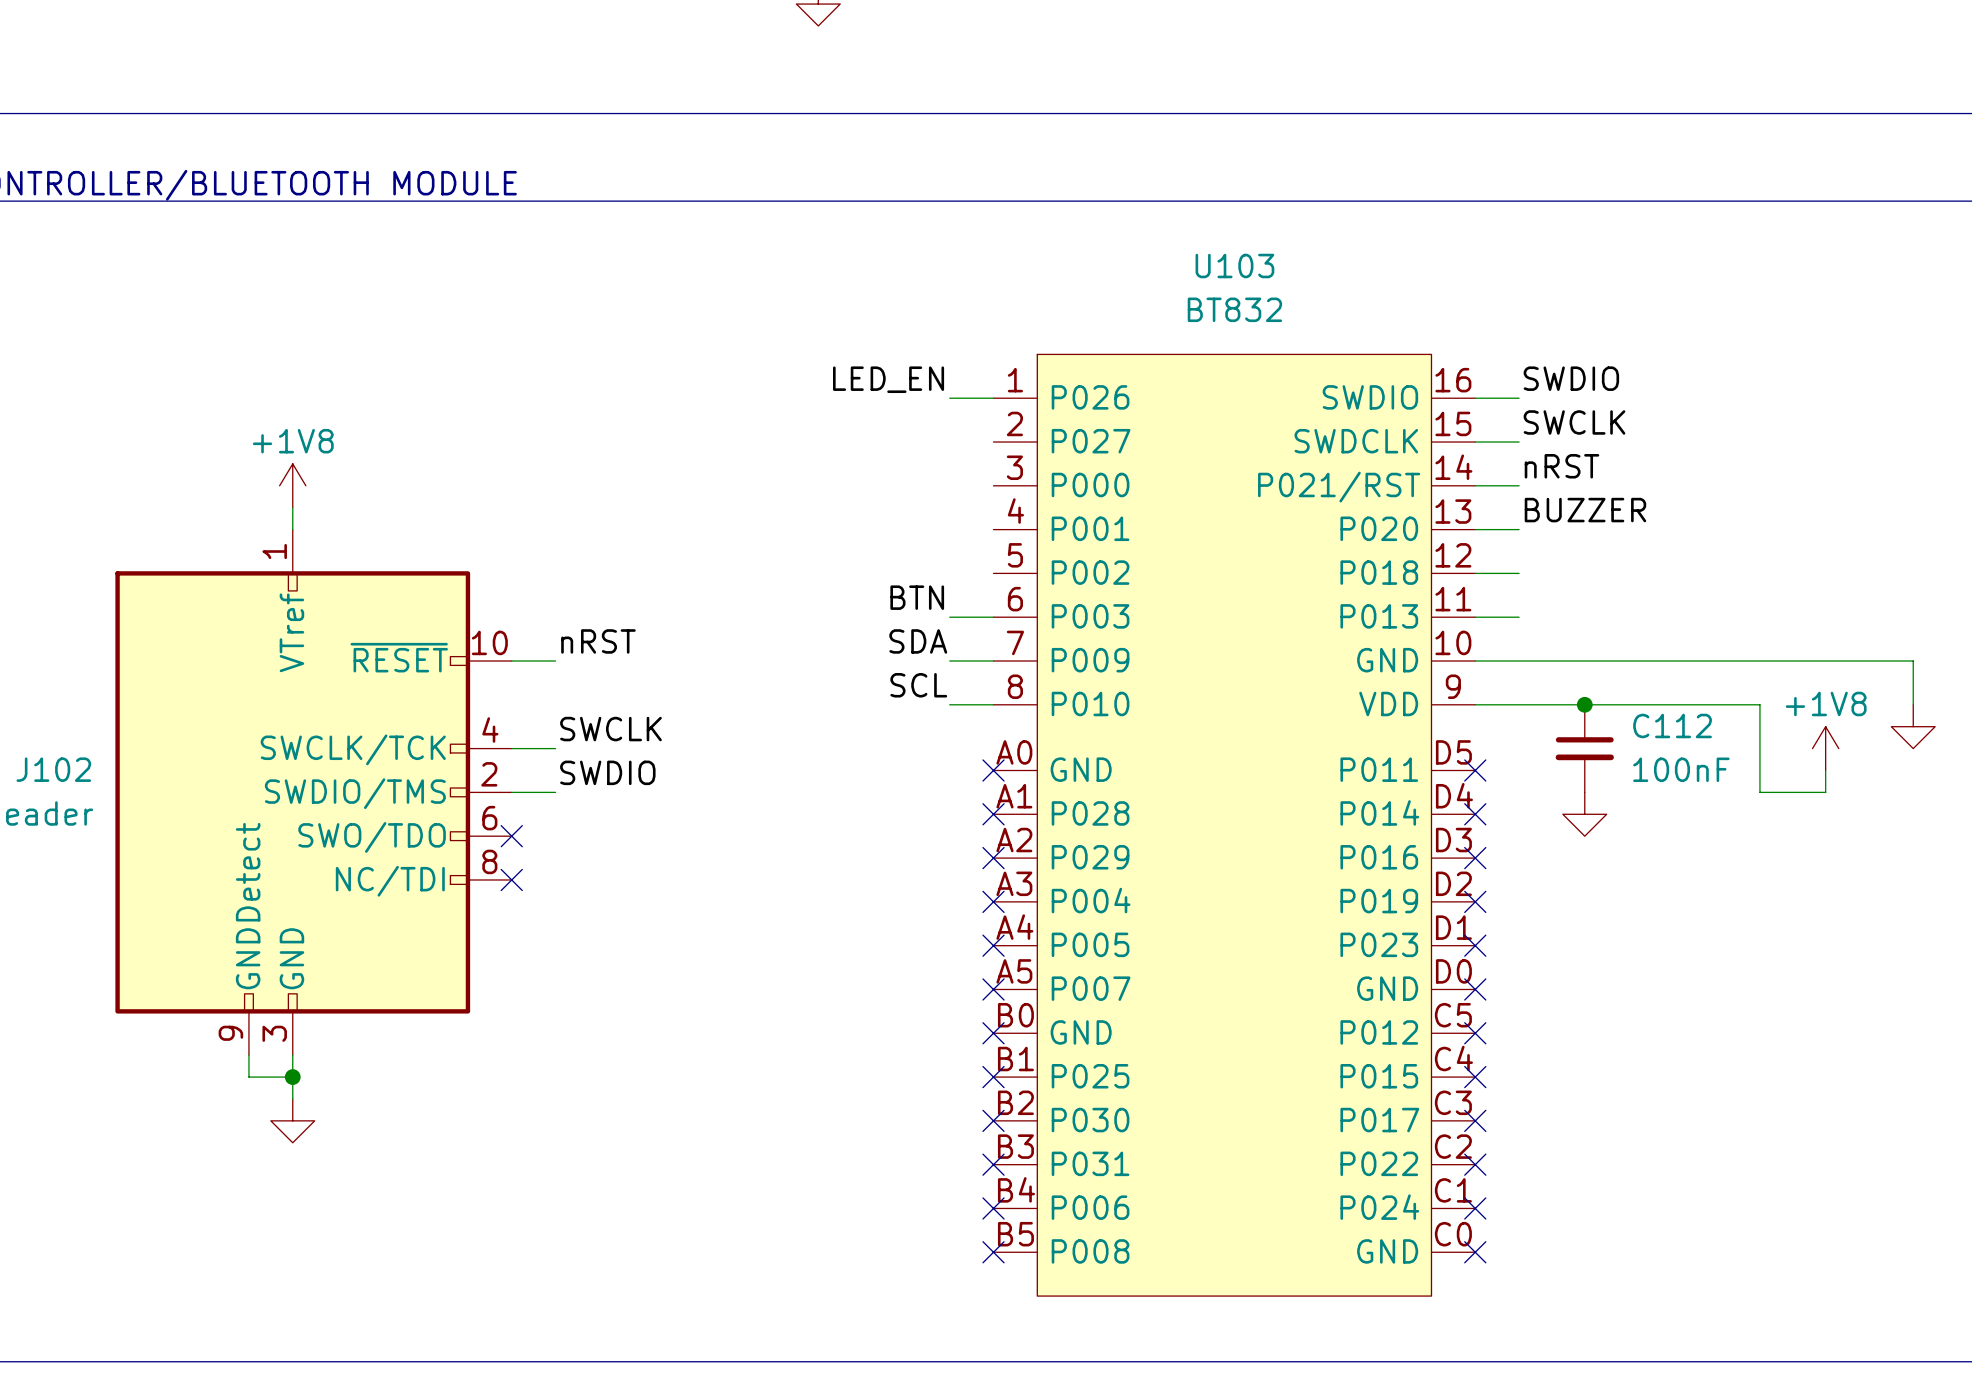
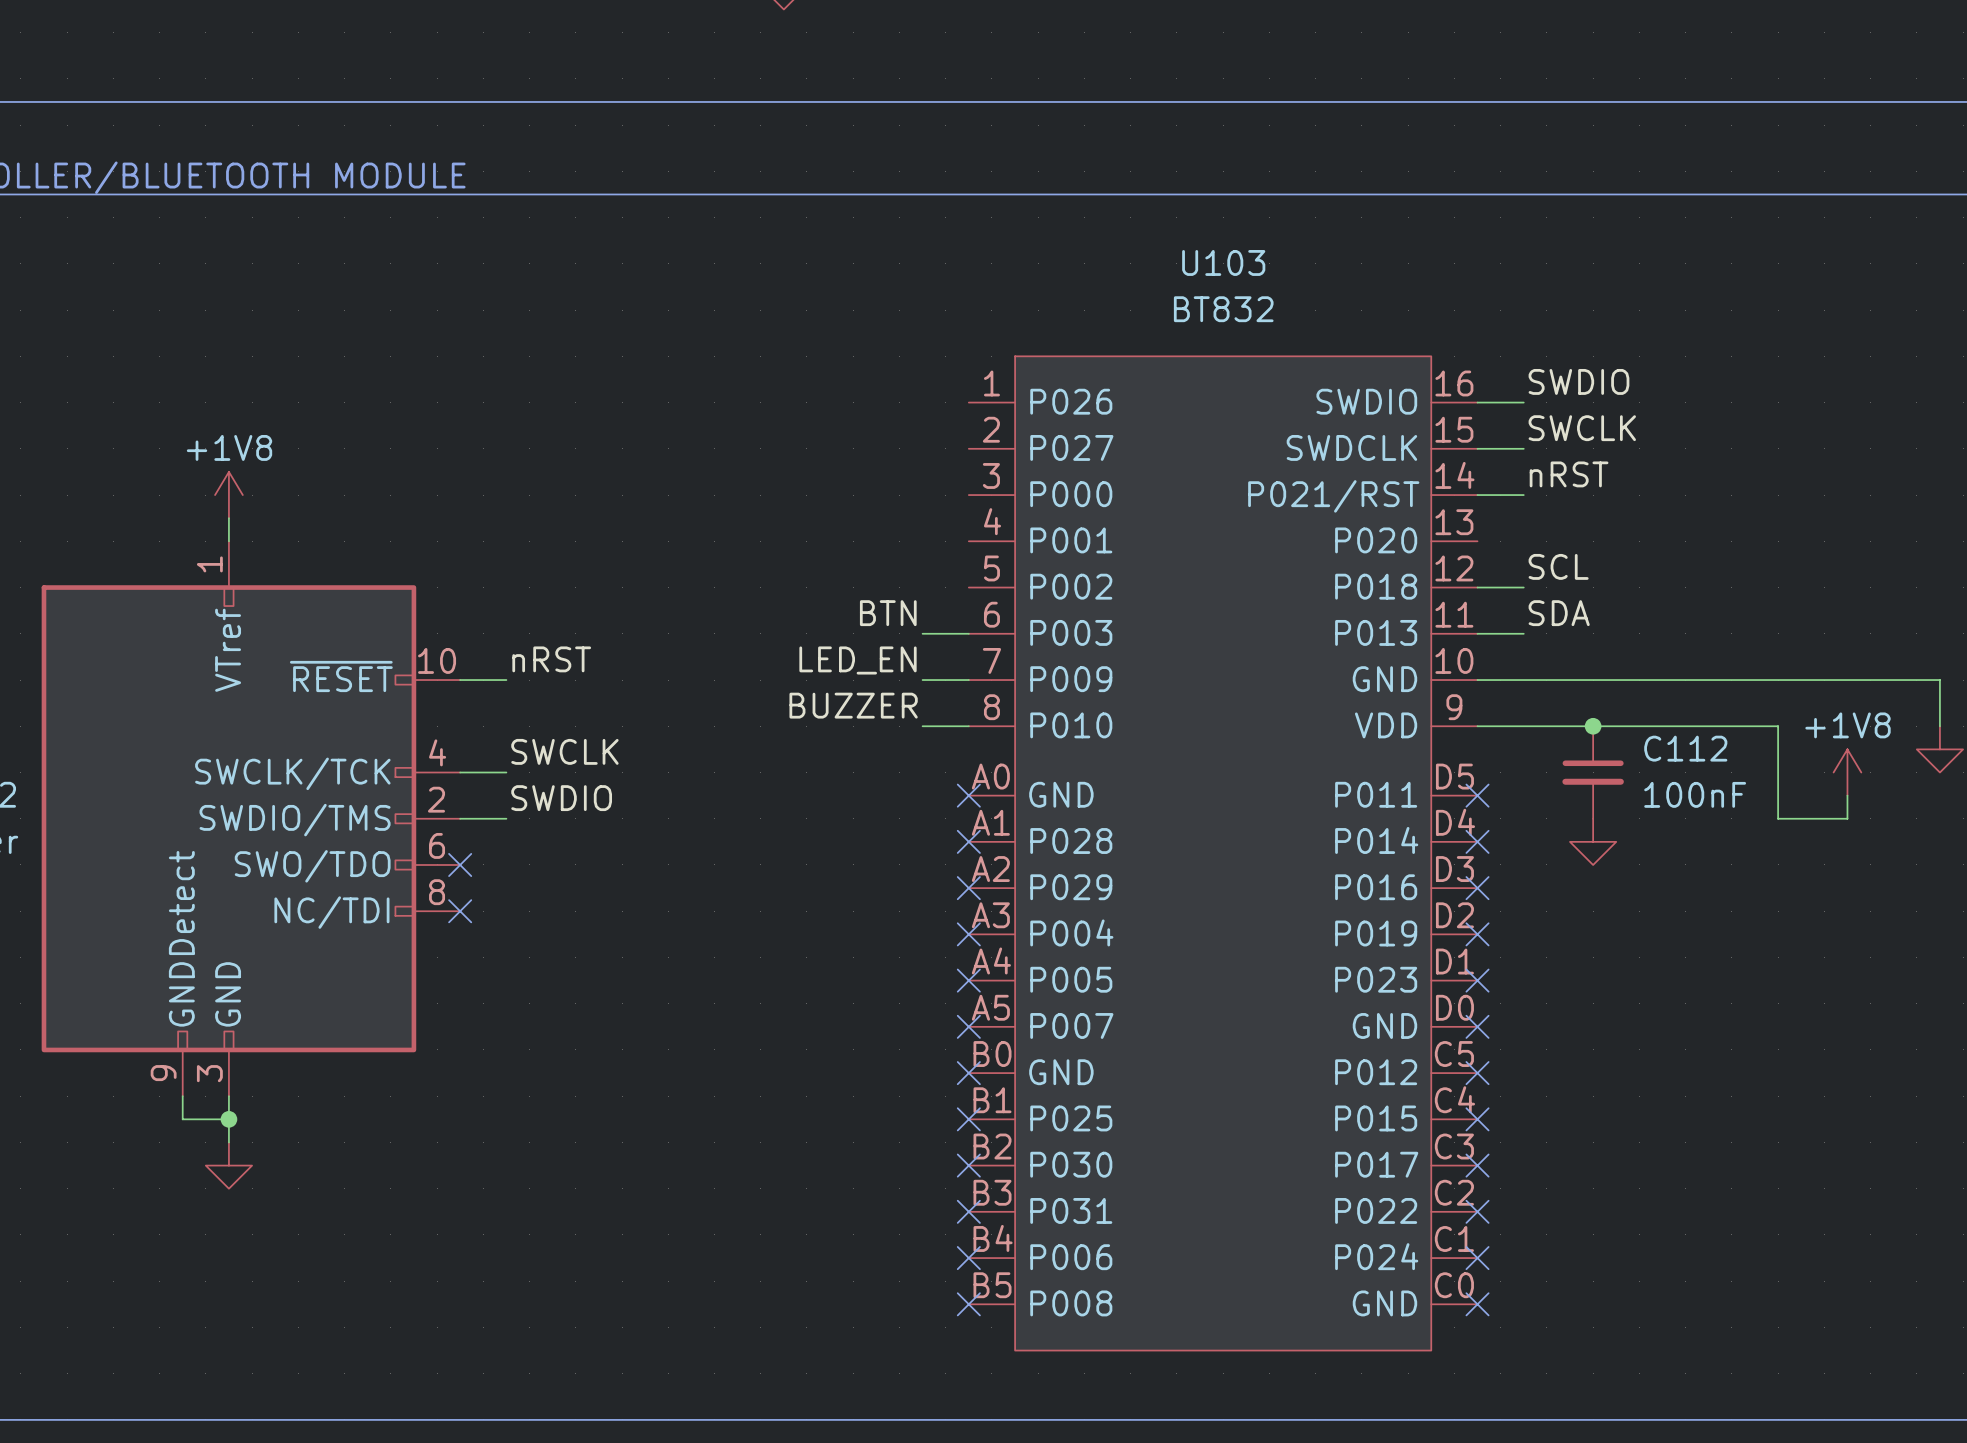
label: LED_EN (888, 379) -> none
wire: (949, 398) (993, 398) -> none
label: BUZZER (1585, 510) -> none
wire: (1475, 529) (1519, 529) -> none
label: none -> SCL (1558, 566)
label: none -> SDA (1559, 613)
label: SDA (918, 641) -> LED_EN (858, 660)
label: SCL (918, 685) -> BUZZER (853, 705)

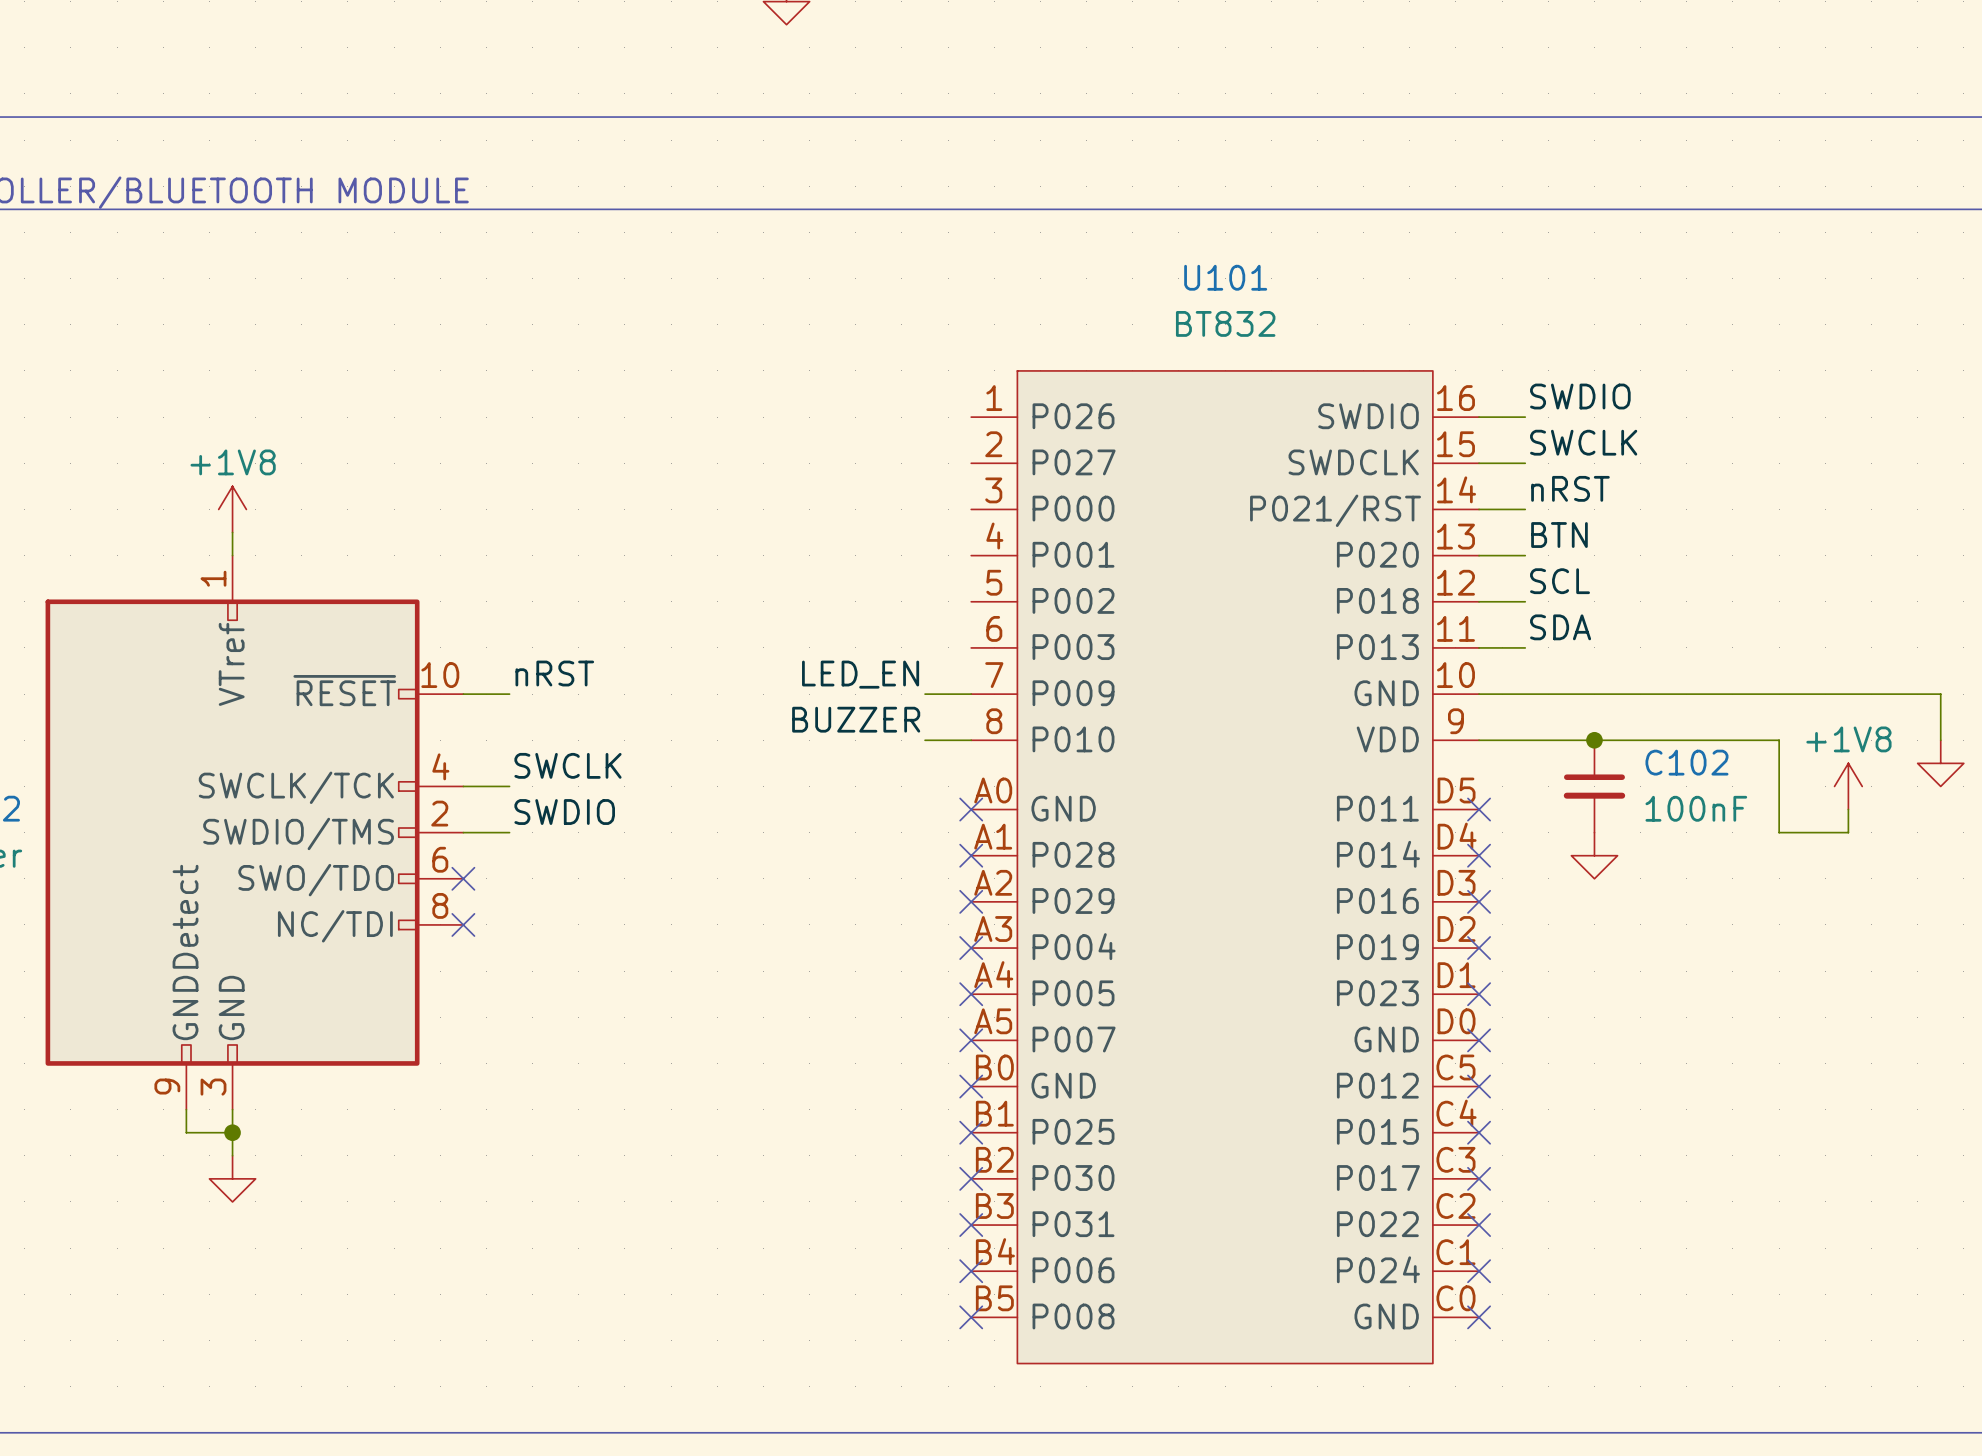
U103 name: U103 (1223, 262) -> U101 (1225, 277)
label: none -> BTN (1559, 535)
wire: none -> (1479, 555) (1525, 555)
label: BTN (888, 613) -> none
wire: (922, 633) (968, 633) -> none
C112 name: C112 (1685, 748) -> C102 (1686, 762)

